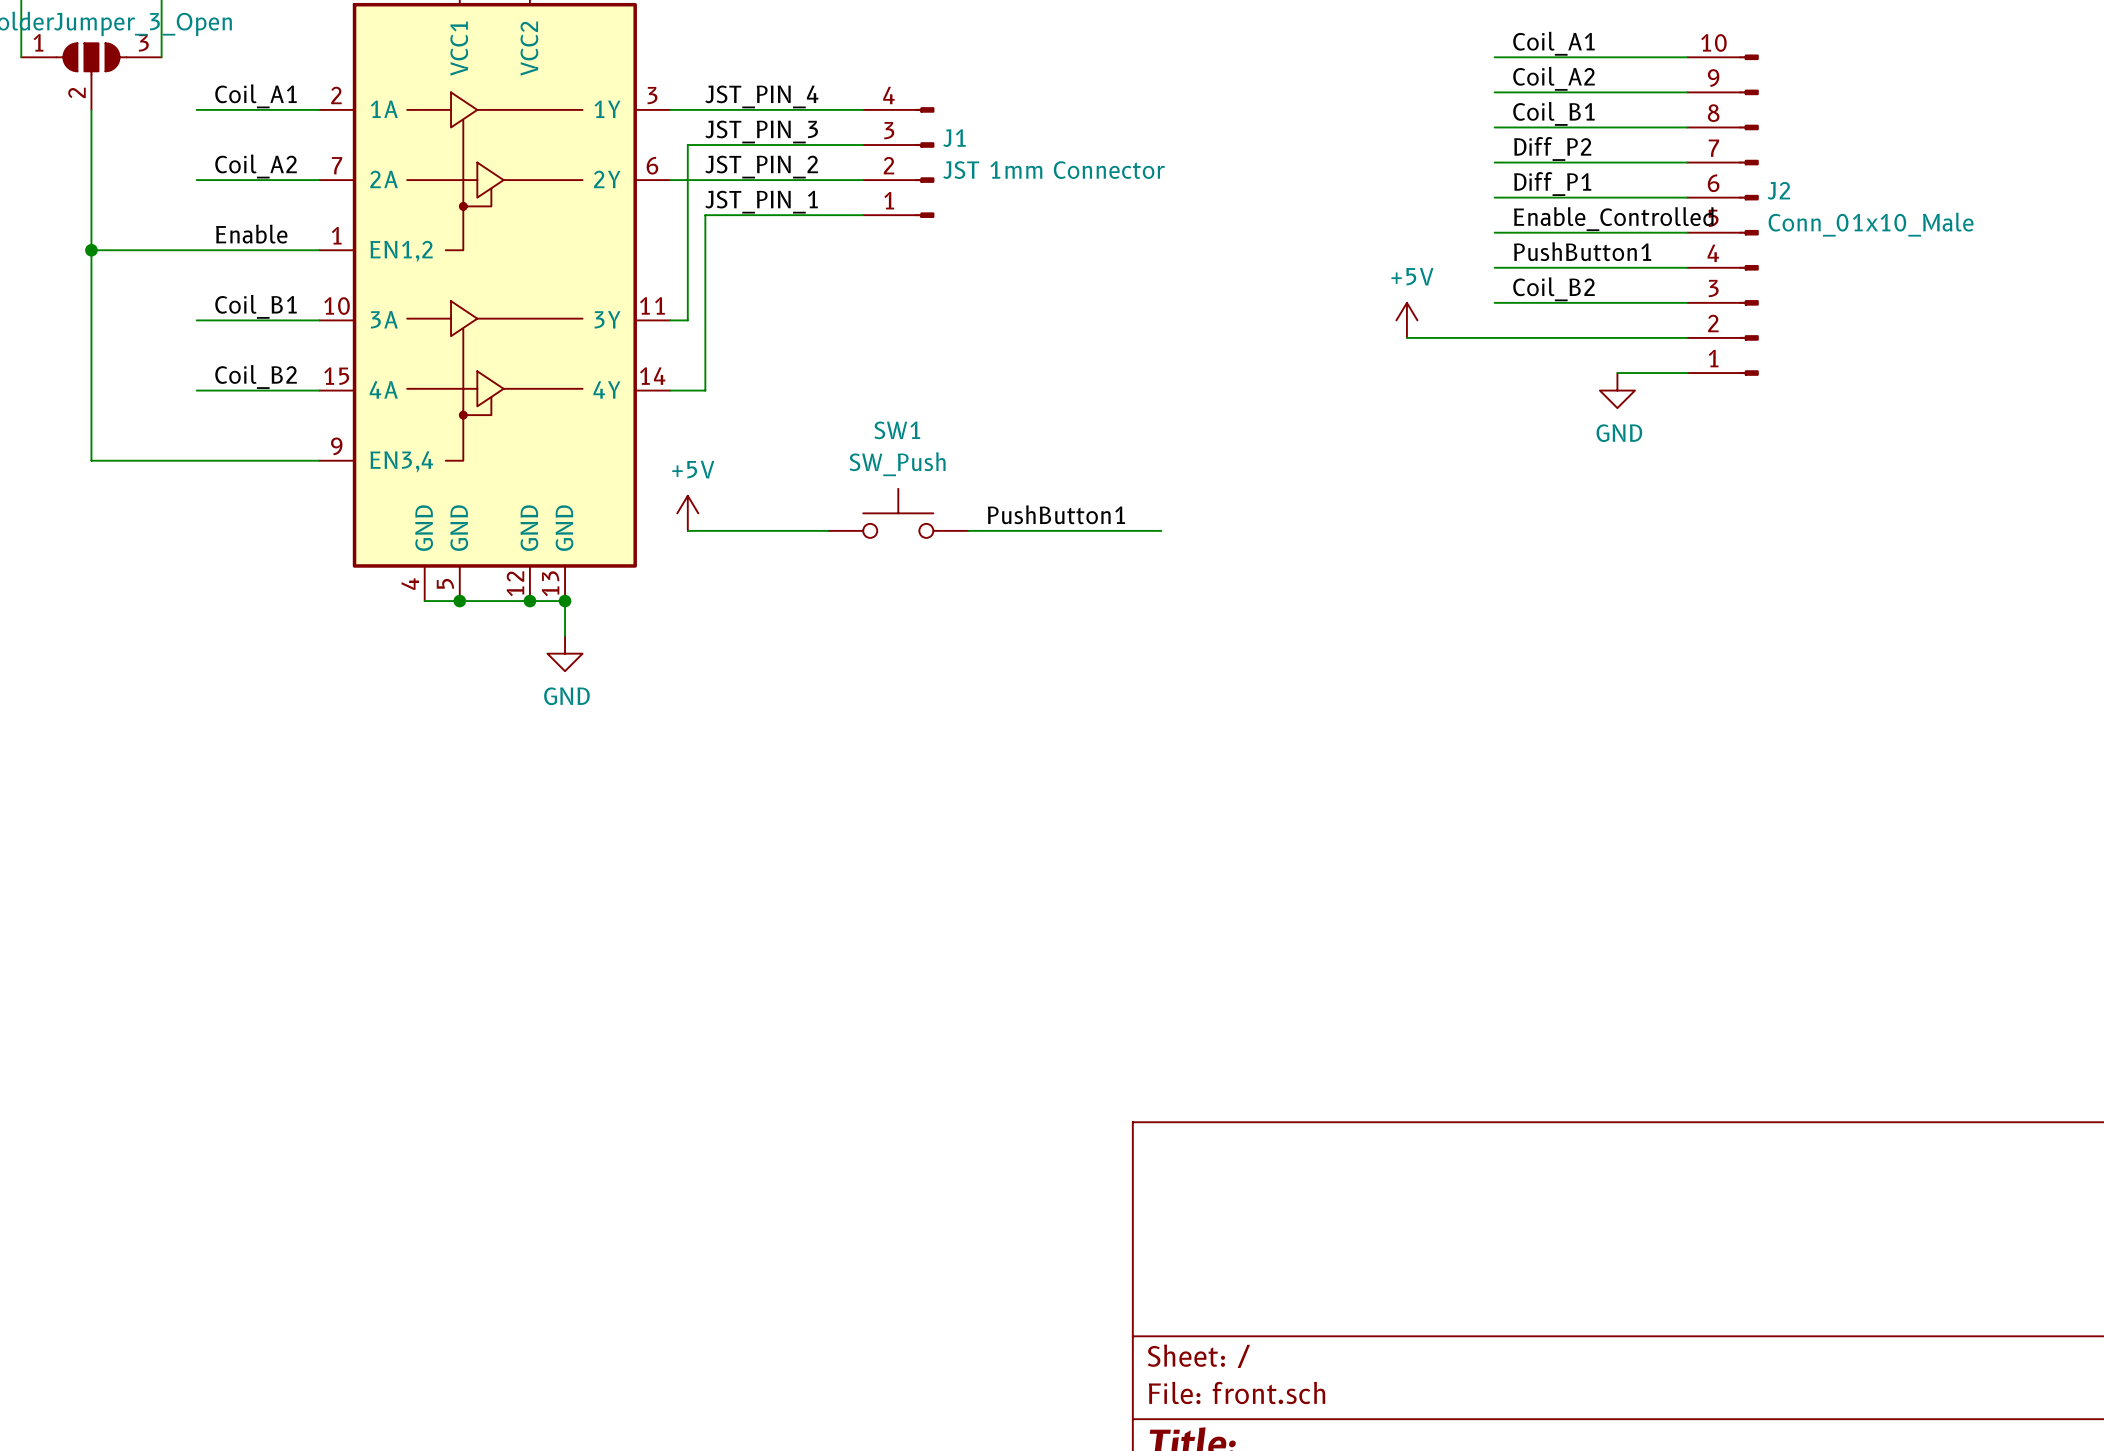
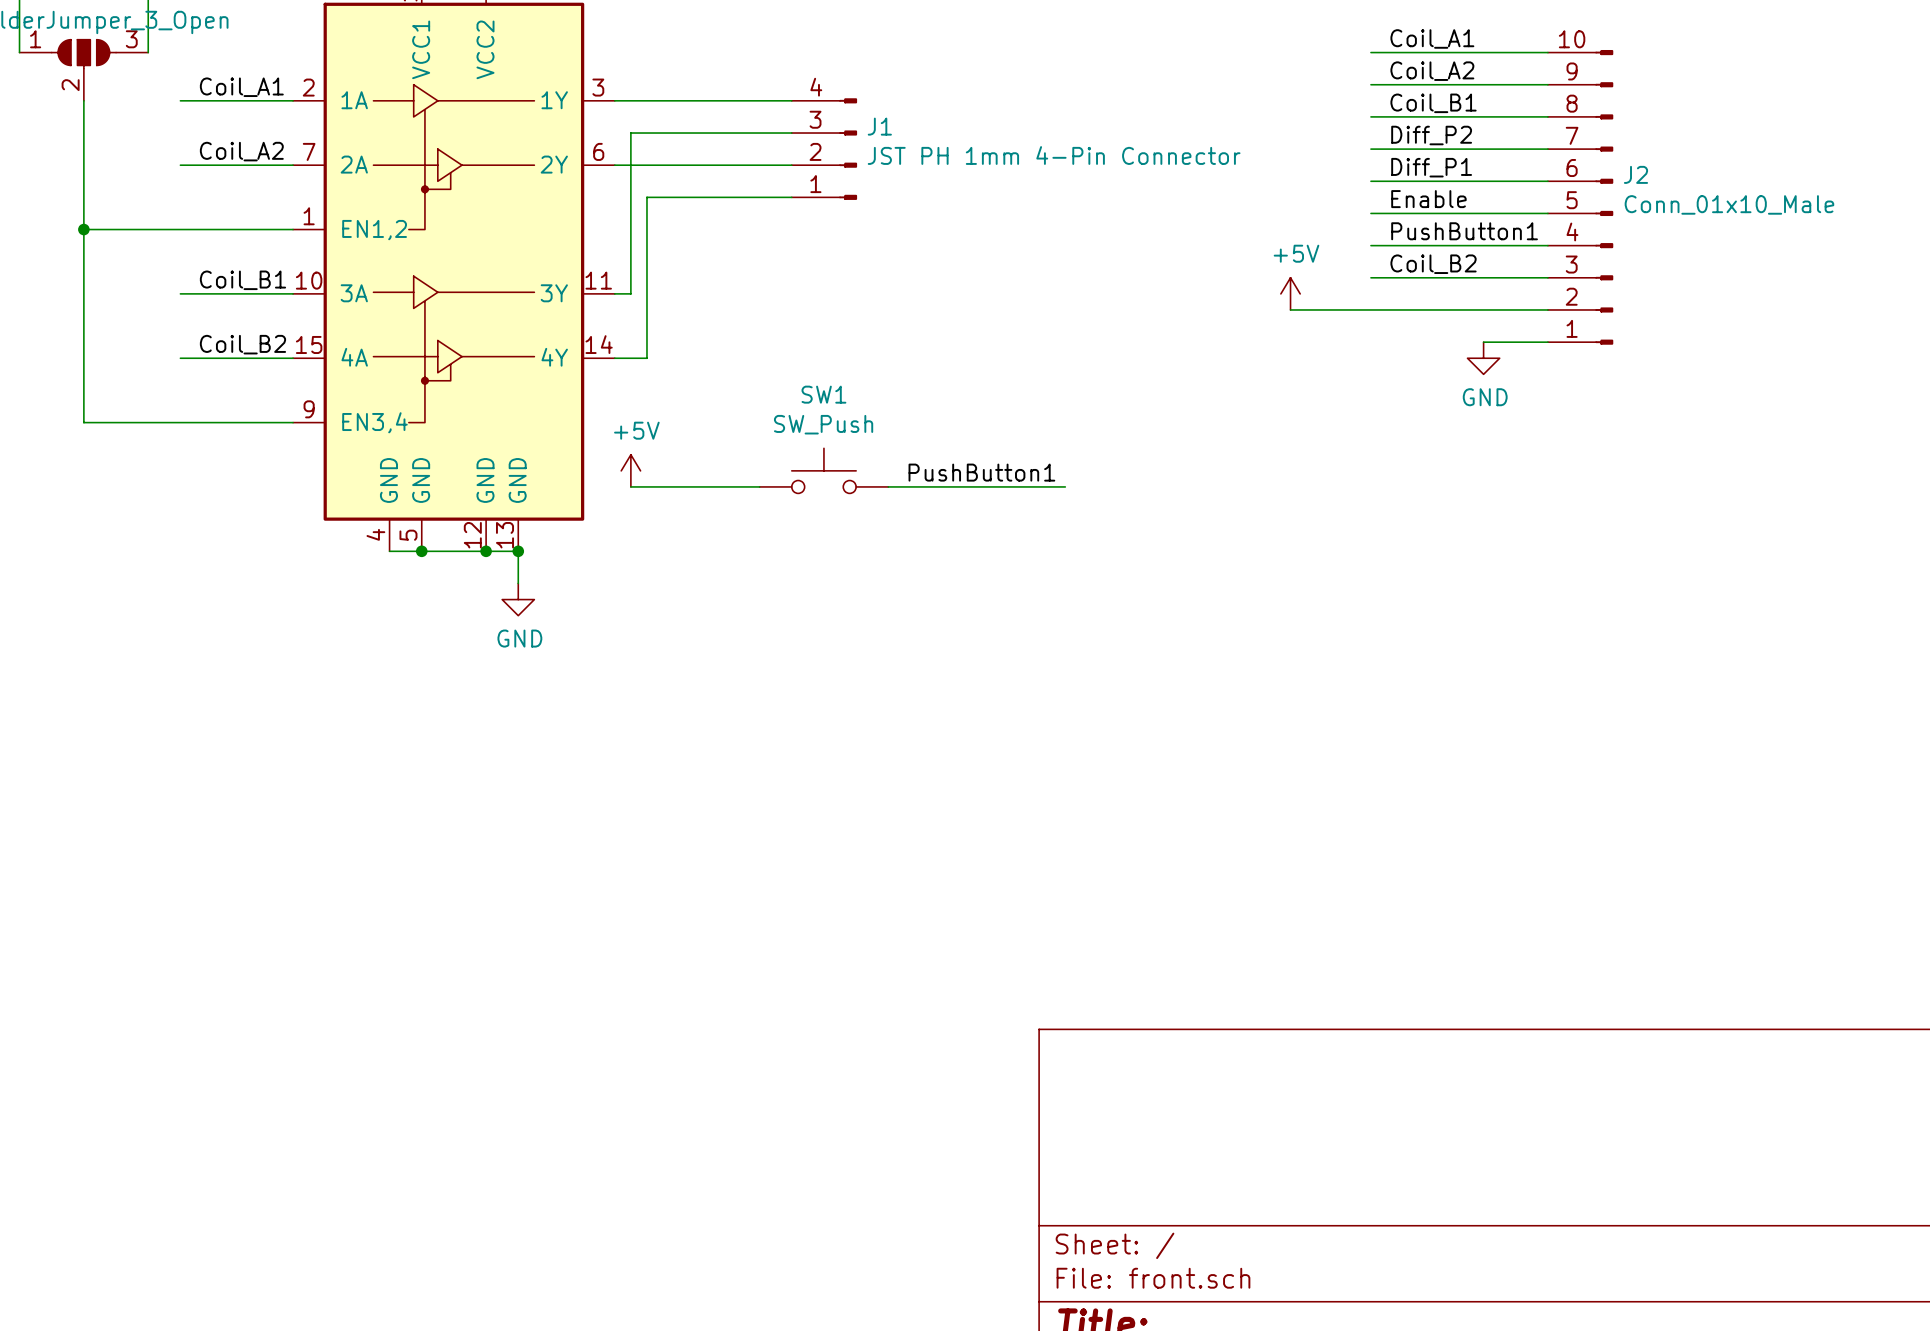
label: JST_PIN_4 (761, 96) -> none
label: JST_PIN_3 (761, 131) -> none
label: JST_PIN_2 (761, 167) -> none
J1 value: JST 1mm Connector (1053, 170) -> JST PH 1mm 4-Pin Connector (1054, 155)
label: JST_PIN_1 (761, 202) -> none
label: Enable_Controlled (1613, 219) -> Enable (1428, 199)
label: Enable (251, 234) -> none

